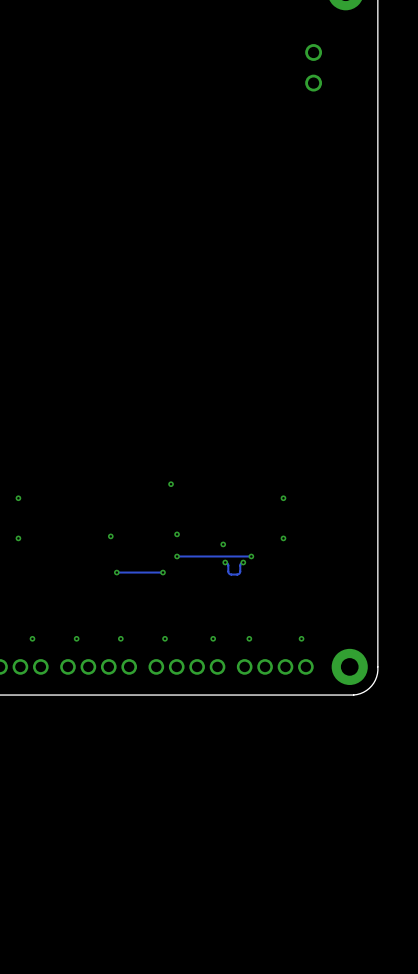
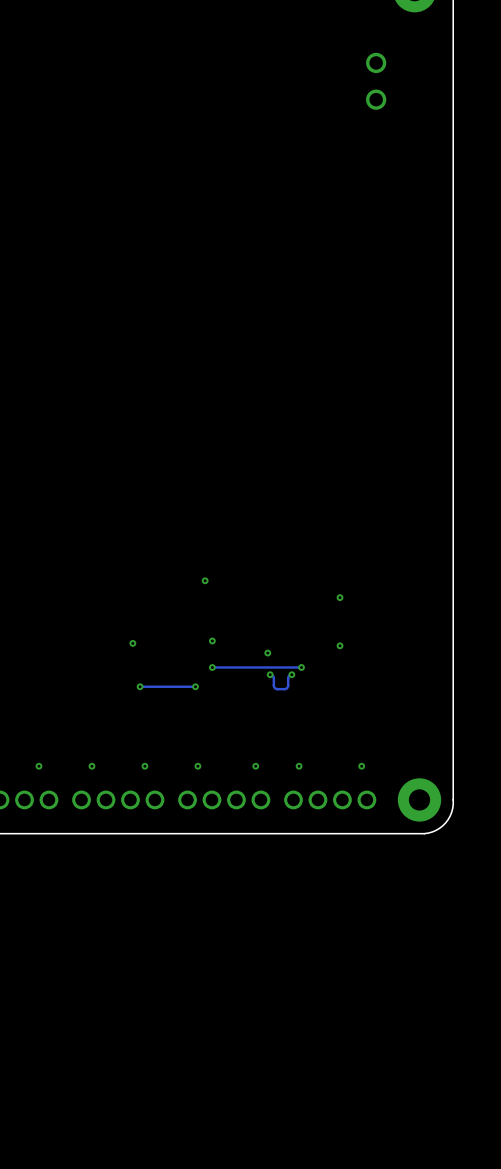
via: (18, 498) -> none
via: (18, 538) -> none

